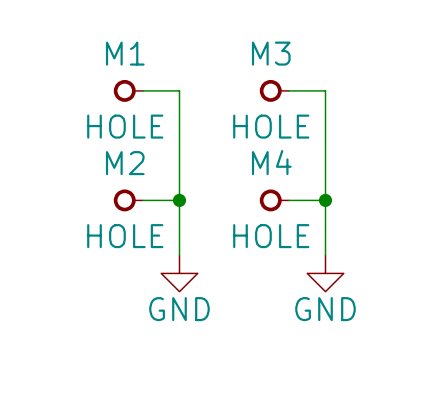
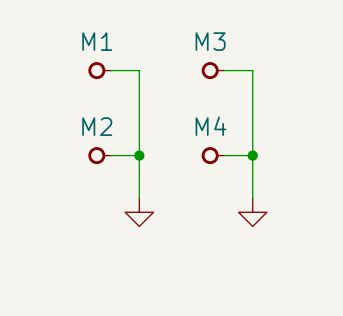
M1 value: HOLE (125, 126) -> none
M3 value: HOLE (271, 126) -> none
M2 value: HOLE (125, 236) -> none
M4 value: HOLE (271, 236) -> none
power symbol text: GND (179, 309) -> none
power symbol text: GND (325, 309) -> none

